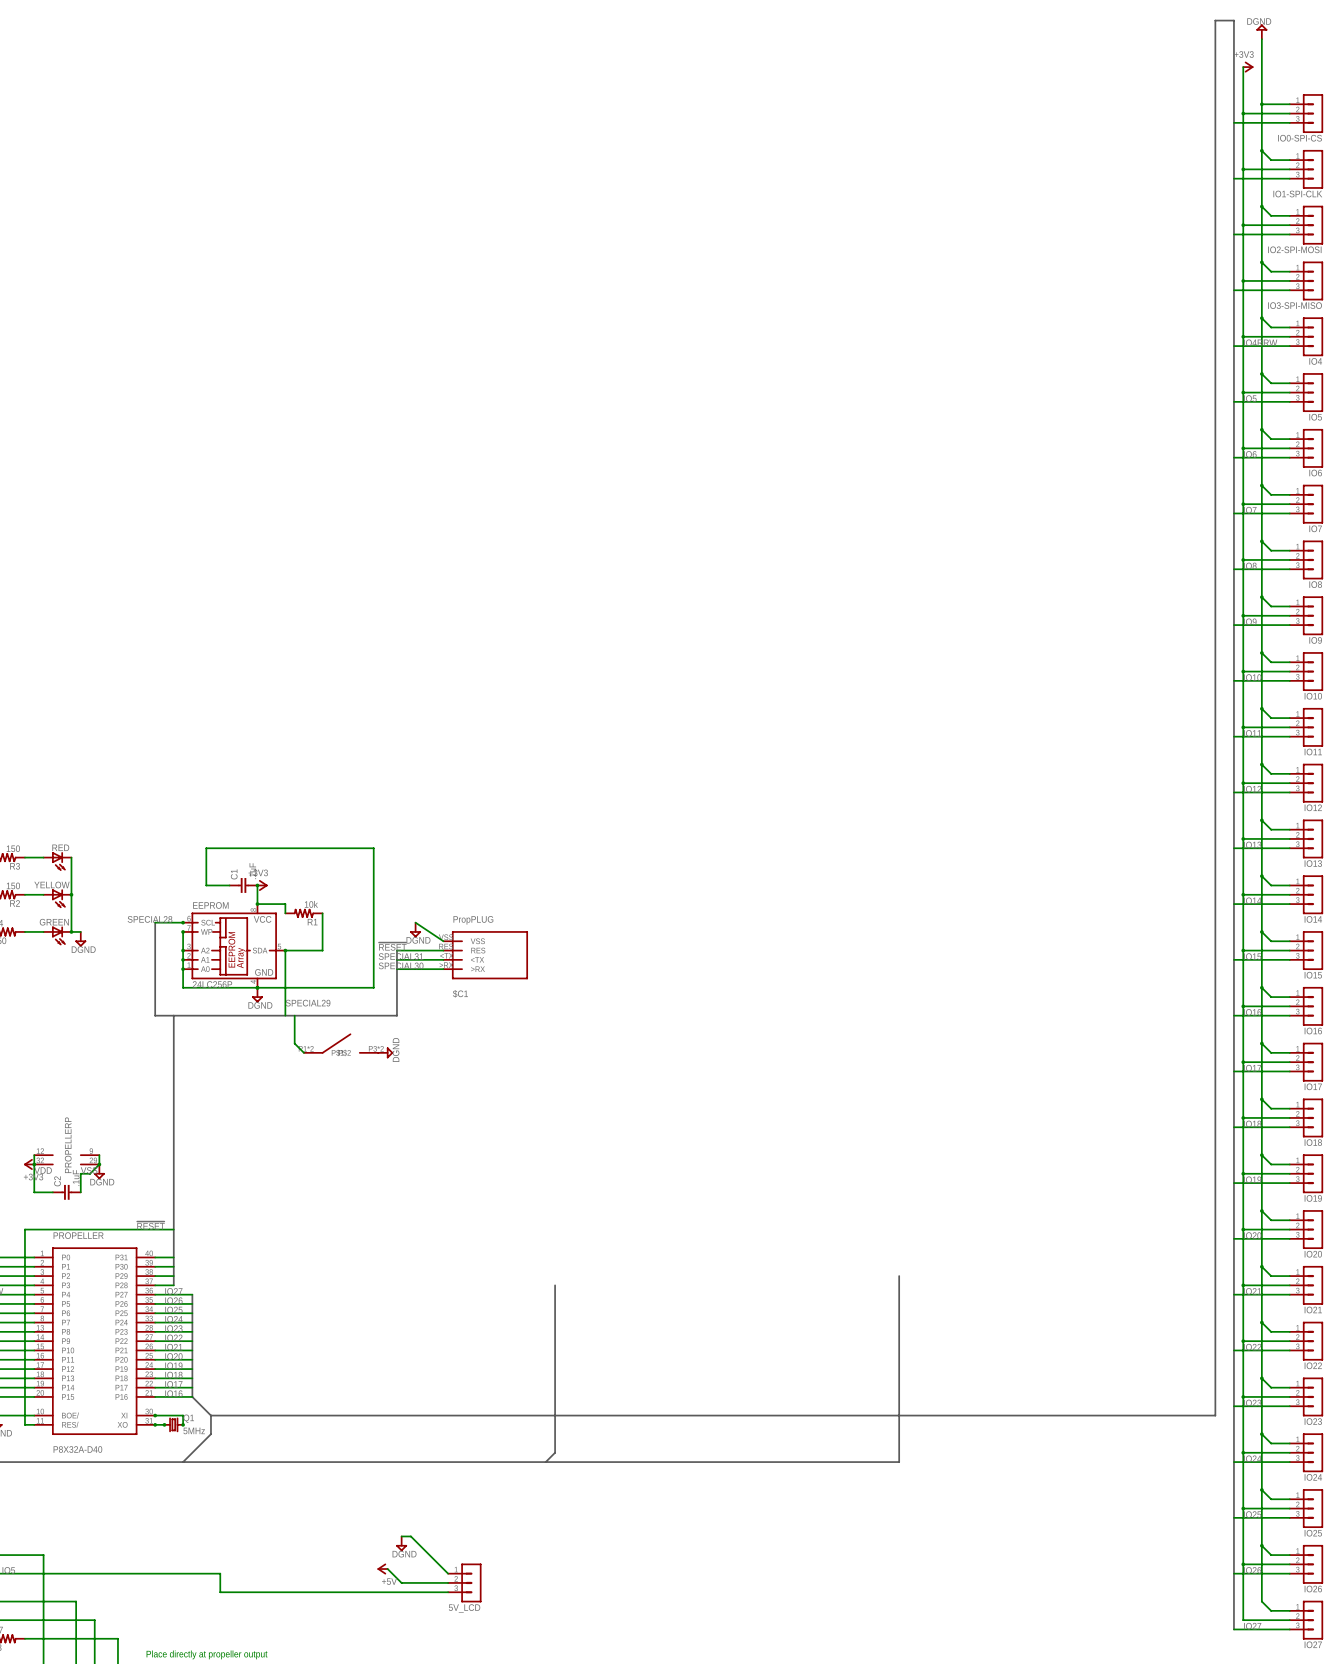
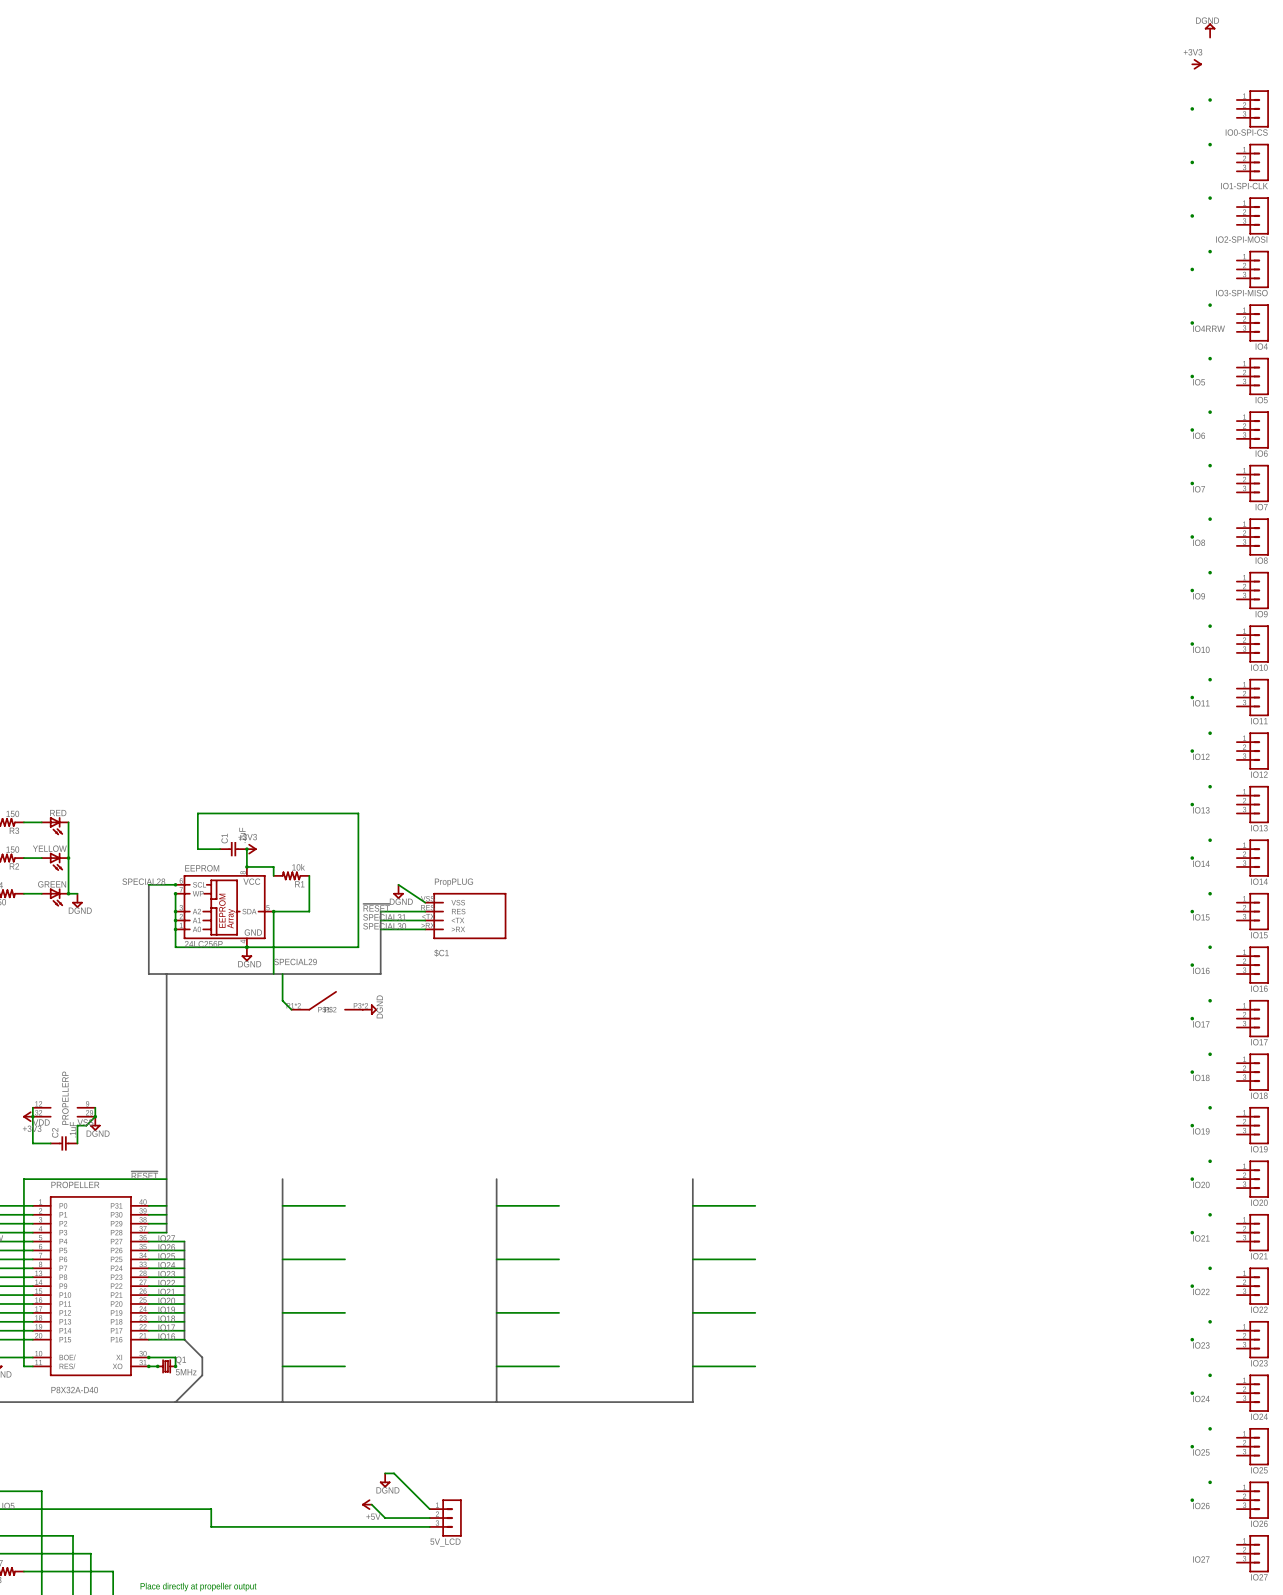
wire: (1261, 39) (1261, 1601) (1271, 1610) (1289, 1610) -> none
wire: (1243, 67) (1243, 1620) (1289, 1620) -> none
wire: (1261, 104) (1289, 104) -> none
wire: (1243, 113) (1289, 113) -> none
wire: (1233, 122) (1289, 122) -> none
wire: (1261, 150) (1271, 160) (1289, 160) -> none
wire: (1243, 169) (1289, 169) -> none
wire: (1233, 178) (1289, 178) -> none
wire: (1261, 206) (1271, 215) (1289, 215) -> none
wire: (1243, 225) (1289, 225) -> none
wire: (1233, 234) (1289, 234) -> none
wire: (1261, 262) (1271, 271) (1289, 271) -> none
wire: (1243, 280) (1289, 280) -> none
wire: (1233, 290) (1289, 290) -> none
wire: (1261, 318) (1271, 327) (1289, 327) -> none
wire: (1243, 336) (1289, 336) -> none
wire: (1233, 346) (1289, 346) -> none
wire: (1261, 373) (1271, 383) (1289, 383) -> none
wire: (1243, 392) (1289, 392) -> none
wire: (1233, 401) (1289, 401) -> none
wire: (1261, 429) (1271, 439) (1289, 439) -> none
wire: (1243, 448) (1289, 448) -> none
wire: (1233, 457) (1289, 457) -> none
wire: (1261, 485) (1271, 494) (1289, 494) -> none
wire: (1243, 504) (1289, 504) -> none
wire: (1233, 513) (1289, 513) -> none
wire: (1261, 541) (1271, 550) (1289, 550) -> none
wire: (1243, 559) (1289, 559) -> none
wire: (1233, 569) (1289, 569) -> none
wire: (1261, 597) (1271, 606) (1289, 606) -> none
wire: (1243, 615) (1289, 615) -> none
wire: (1233, 625) (1289, 625) -> none
wire: (1261, 652) (1271, 662) (1289, 662) -> none
wire: (1243, 671) (1289, 671) -> none
wire: (1233, 680) (1289, 680) -> none
wire: (1261, 708) (1271, 718) (1289, 718) -> none
wire: (1243, 727) (1289, 727) -> none
wire: (1233, 736) (1289, 736) -> none
wire: (1261, 764) (1271, 773) (1289, 773) -> none
wire: (1243, 783) (1289, 783) -> none
wire: (1233, 792) (1289, 792) -> none
wire: (1261, 820) (1271, 829) (1289, 829) -> none
wire: (1243, 838) (1289, 838) -> none
wire: (1233, 848) (1289, 848) -> none
wire: (1261, 876) (1271, 885) (1289, 885) -> none
wire: (1243, 894) (1289, 894) -> none
wire: (1233, 904) (1289, 904) -> none
wire: (1261, 931) (1271, 941) (1289, 941) -> none
wire: (1243, 950) (1289, 950) -> none
wire: (1233, 959) (1289, 959) -> none
wire: (1261, 987) (1271, 997) (1289, 997) -> none
wire: (1243, 1006) (1289, 1006) -> none
wire: (1233, 1015) (1289, 1015) -> none
wire: (1261, 1043) (1271, 1052) (1289, 1052) -> none
wire: (1243, 1062) (1289, 1062) -> none
wire: (1233, 1071) (1289, 1071) -> none
wire: (1261, 1099) (1271, 1108) (1289, 1108) -> none
wire: (1243, 1117) (1289, 1117) -> none
wire: (1233, 1127) (1289, 1127) -> none
wire: (1261, 1155) (1271, 1164) (1289, 1164) -> none
wire: (1243, 1173) (1289, 1173) -> none
wire: (1233, 1183) (1289, 1183) -> none
wire: (1261, 1210) (1271, 1220) (1289, 1220) -> none
bus: none -> (282, 1179) (282, 1402)
bus: none -> (496, 1179) (496, 1402)
wire: (1243, 1229) (1289, 1229) -> none
wire: (1233, 1238) (1289, 1238) -> none
wire: none -> (282, 1205) (345, 1205)
wire: none -> (496, 1205) (559, 1205)
wire: none -> (692, 1205) (755, 1205)
wire: (1261, 1266) (1271, 1276) (1289, 1276) -> none
bus: (899, 1276) (899, 1462) (722, 1462) -> (692, 1179) (692, 1402)
bus: (555, 1285) (555, 1452) (545, 1462) -> none
wire: (1243, 1285) (1289, 1285) -> none
wire: (1233, 1294) (1289, 1294) -> none
wire: none -> (282, 1259) (345, 1259)
wire: none -> (496, 1259) (559, 1259)
wire: none -> (692, 1259) (755, 1259)
wire: (1261, 1322) (1271, 1331) (1289, 1331) -> none
wire: (1243, 1341) (1289, 1341) -> none
wire: (1233, 1350) (1289, 1350) -> none
wire: none -> (282, 1312) (345, 1312)
wire: none -> (496, 1312) (559, 1312)
wire: none -> (692, 1312) (755, 1312)
wire: (1261, 1378) (1271, 1387) (1289, 1387) -> none
wire: (1243, 1396) (1289, 1396) -> none
wire: (1233, 1406) (1289, 1406) -> none
bus: (210, 1415) (1215, 1415) (1215, 20) (1233, 20) (1233, 1629) -> none
wire: none -> (282, 1366) (345, 1366)
wire: none -> (496, 1366) (559, 1366)
wire: none -> (692, 1366) (755, 1366)
wire: (1261, 1434) (1271, 1443) (1289, 1443) -> none
wire: (1243, 1452) (1289, 1452) -> none
wire: (1233, 1462) (1289, 1462) -> none
wire: (1261, 1489) (1271, 1499) (1289, 1499) -> none
wire: (1243, 1508) (1289, 1508) -> none
wire: (1233, 1517) (1289, 1517) -> none
wire: (1261, 1545) (1271, 1555) (1289, 1555) -> none
wire: (1243, 1564) (1289, 1564) -> none
wire: (1233, 1573) (1289, 1573) -> none
wire: (1233, 1629) (1289, 1629) -> none

